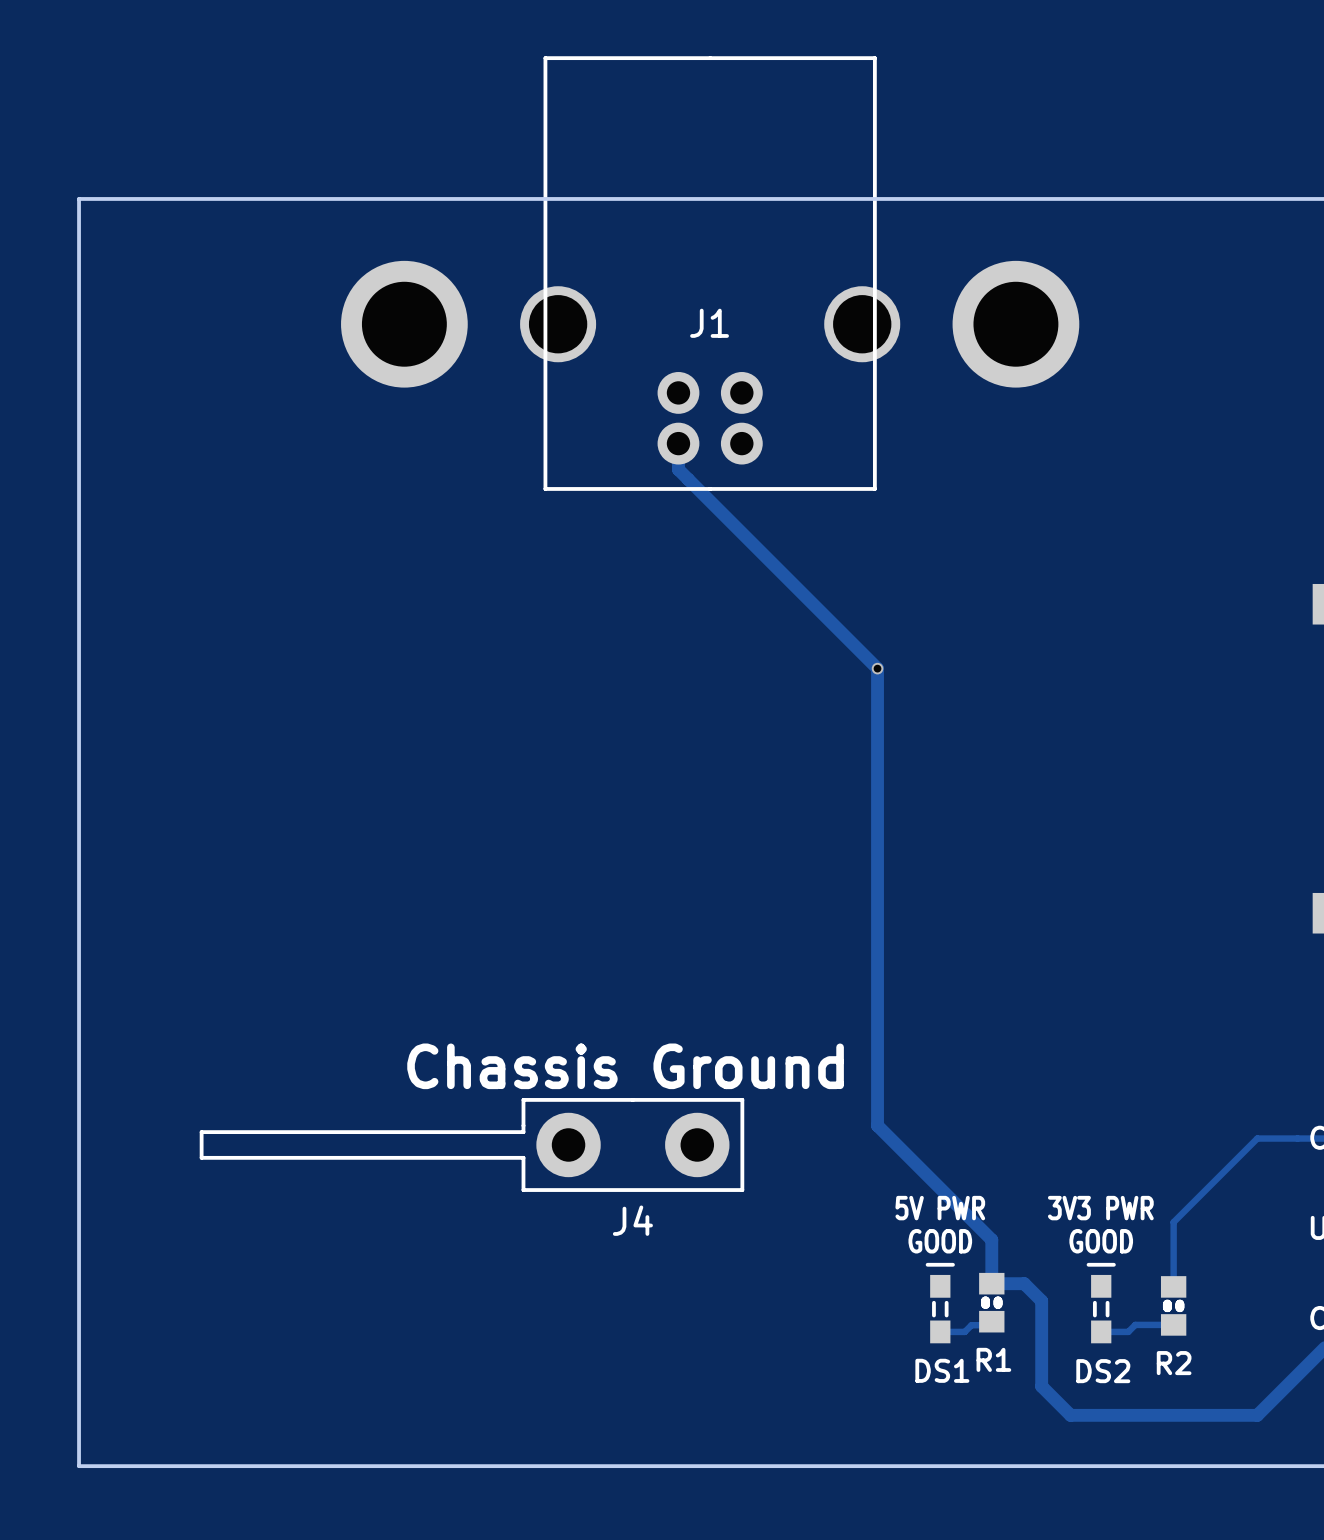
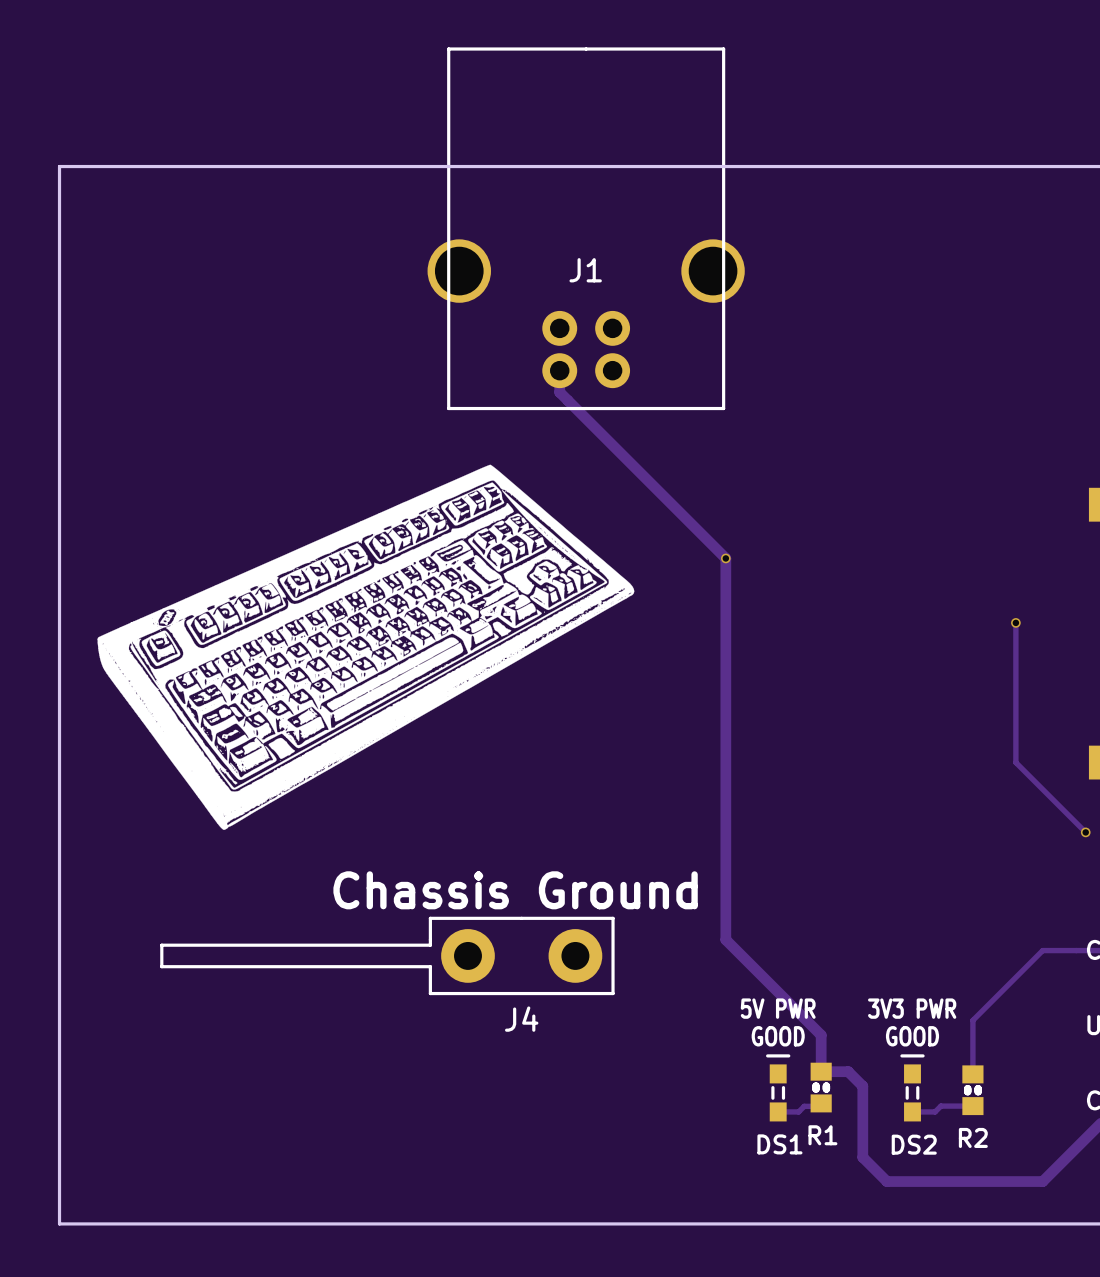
part: (404, 324) -> none
part: (1015, 324) -> none
drawing: none -> [97, 464, 635, 831]
track: none -> (1015, 622) (1015, 762) (1085, 832)
via: none -> (1015, 622)
via: none -> (1085, 832)

